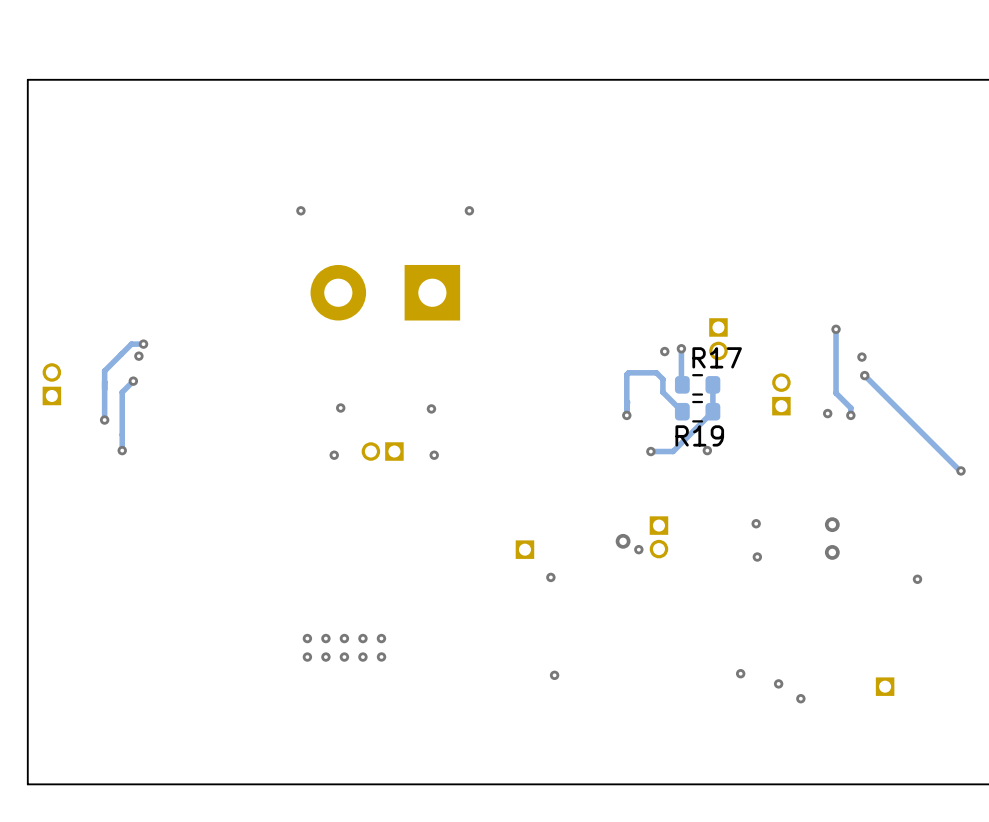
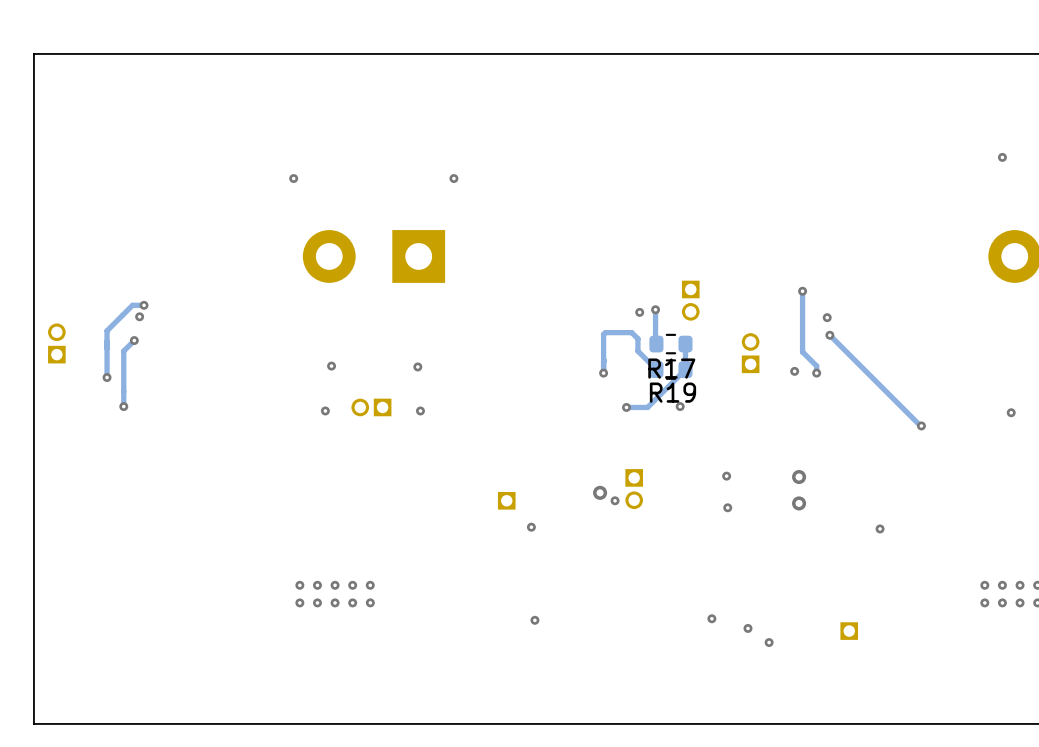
R17 name position: R17 (717, 357) -> R17 (671, 368)

